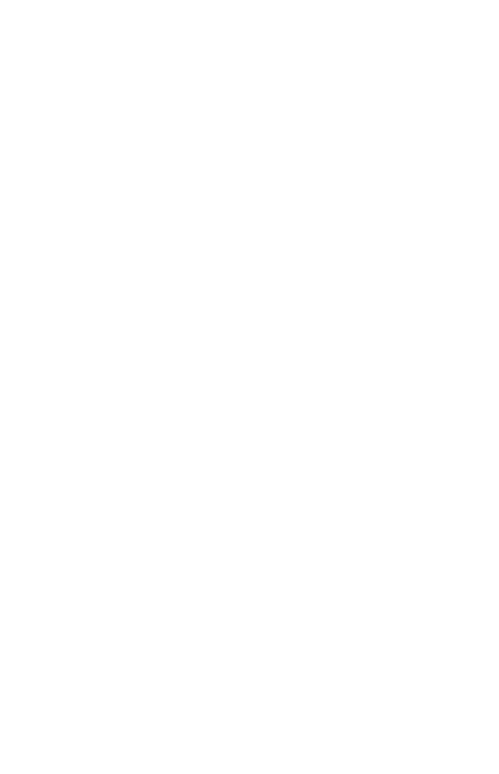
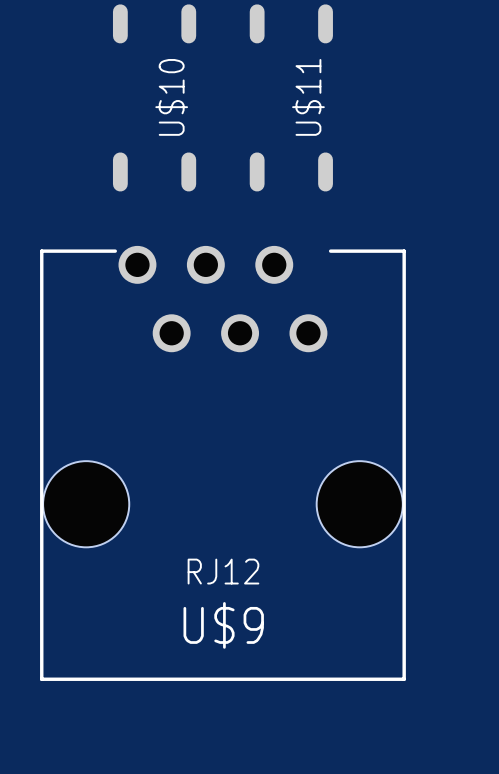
U$10: none -> (154, 97)
U$11: none -> (291, 97)
U$9: none -> RJ12 (222, 463)

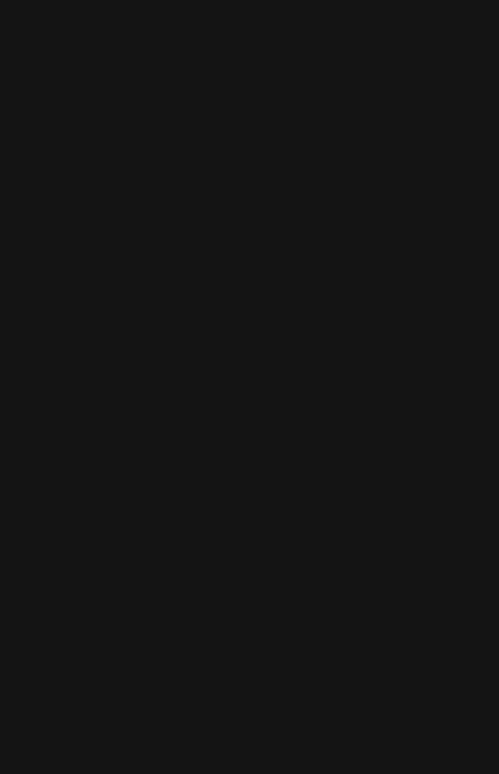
U$10: (154, 97) -> none
U$11: (291, 97) -> none
U$9: RJ12 (222, 463) -> none

